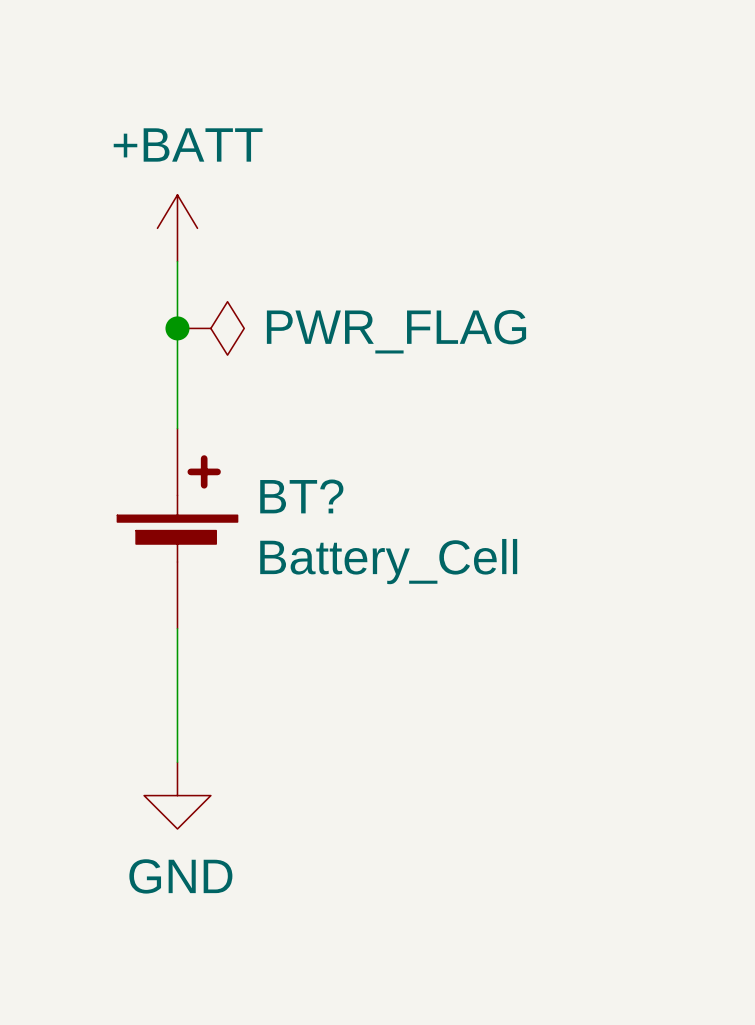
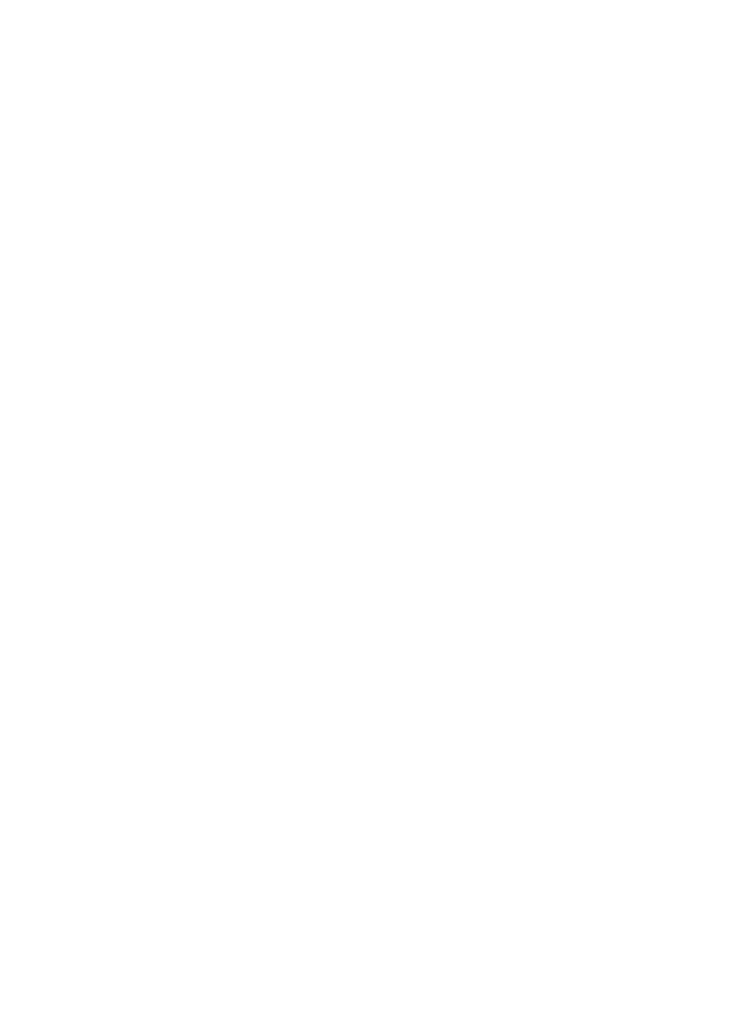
power symbol: +BATT (177, 228) -> none
wire: (177, 261) (177, 428) -> none
junction: (177, 328) -> none
power symbol: PWR_FLAG (210, 328) -> none
BT?: Battery_Cell (177, 528) -> none
wire: (177, 628) (177, 762) -> none
power symbol: GND (177, 795) -> none

